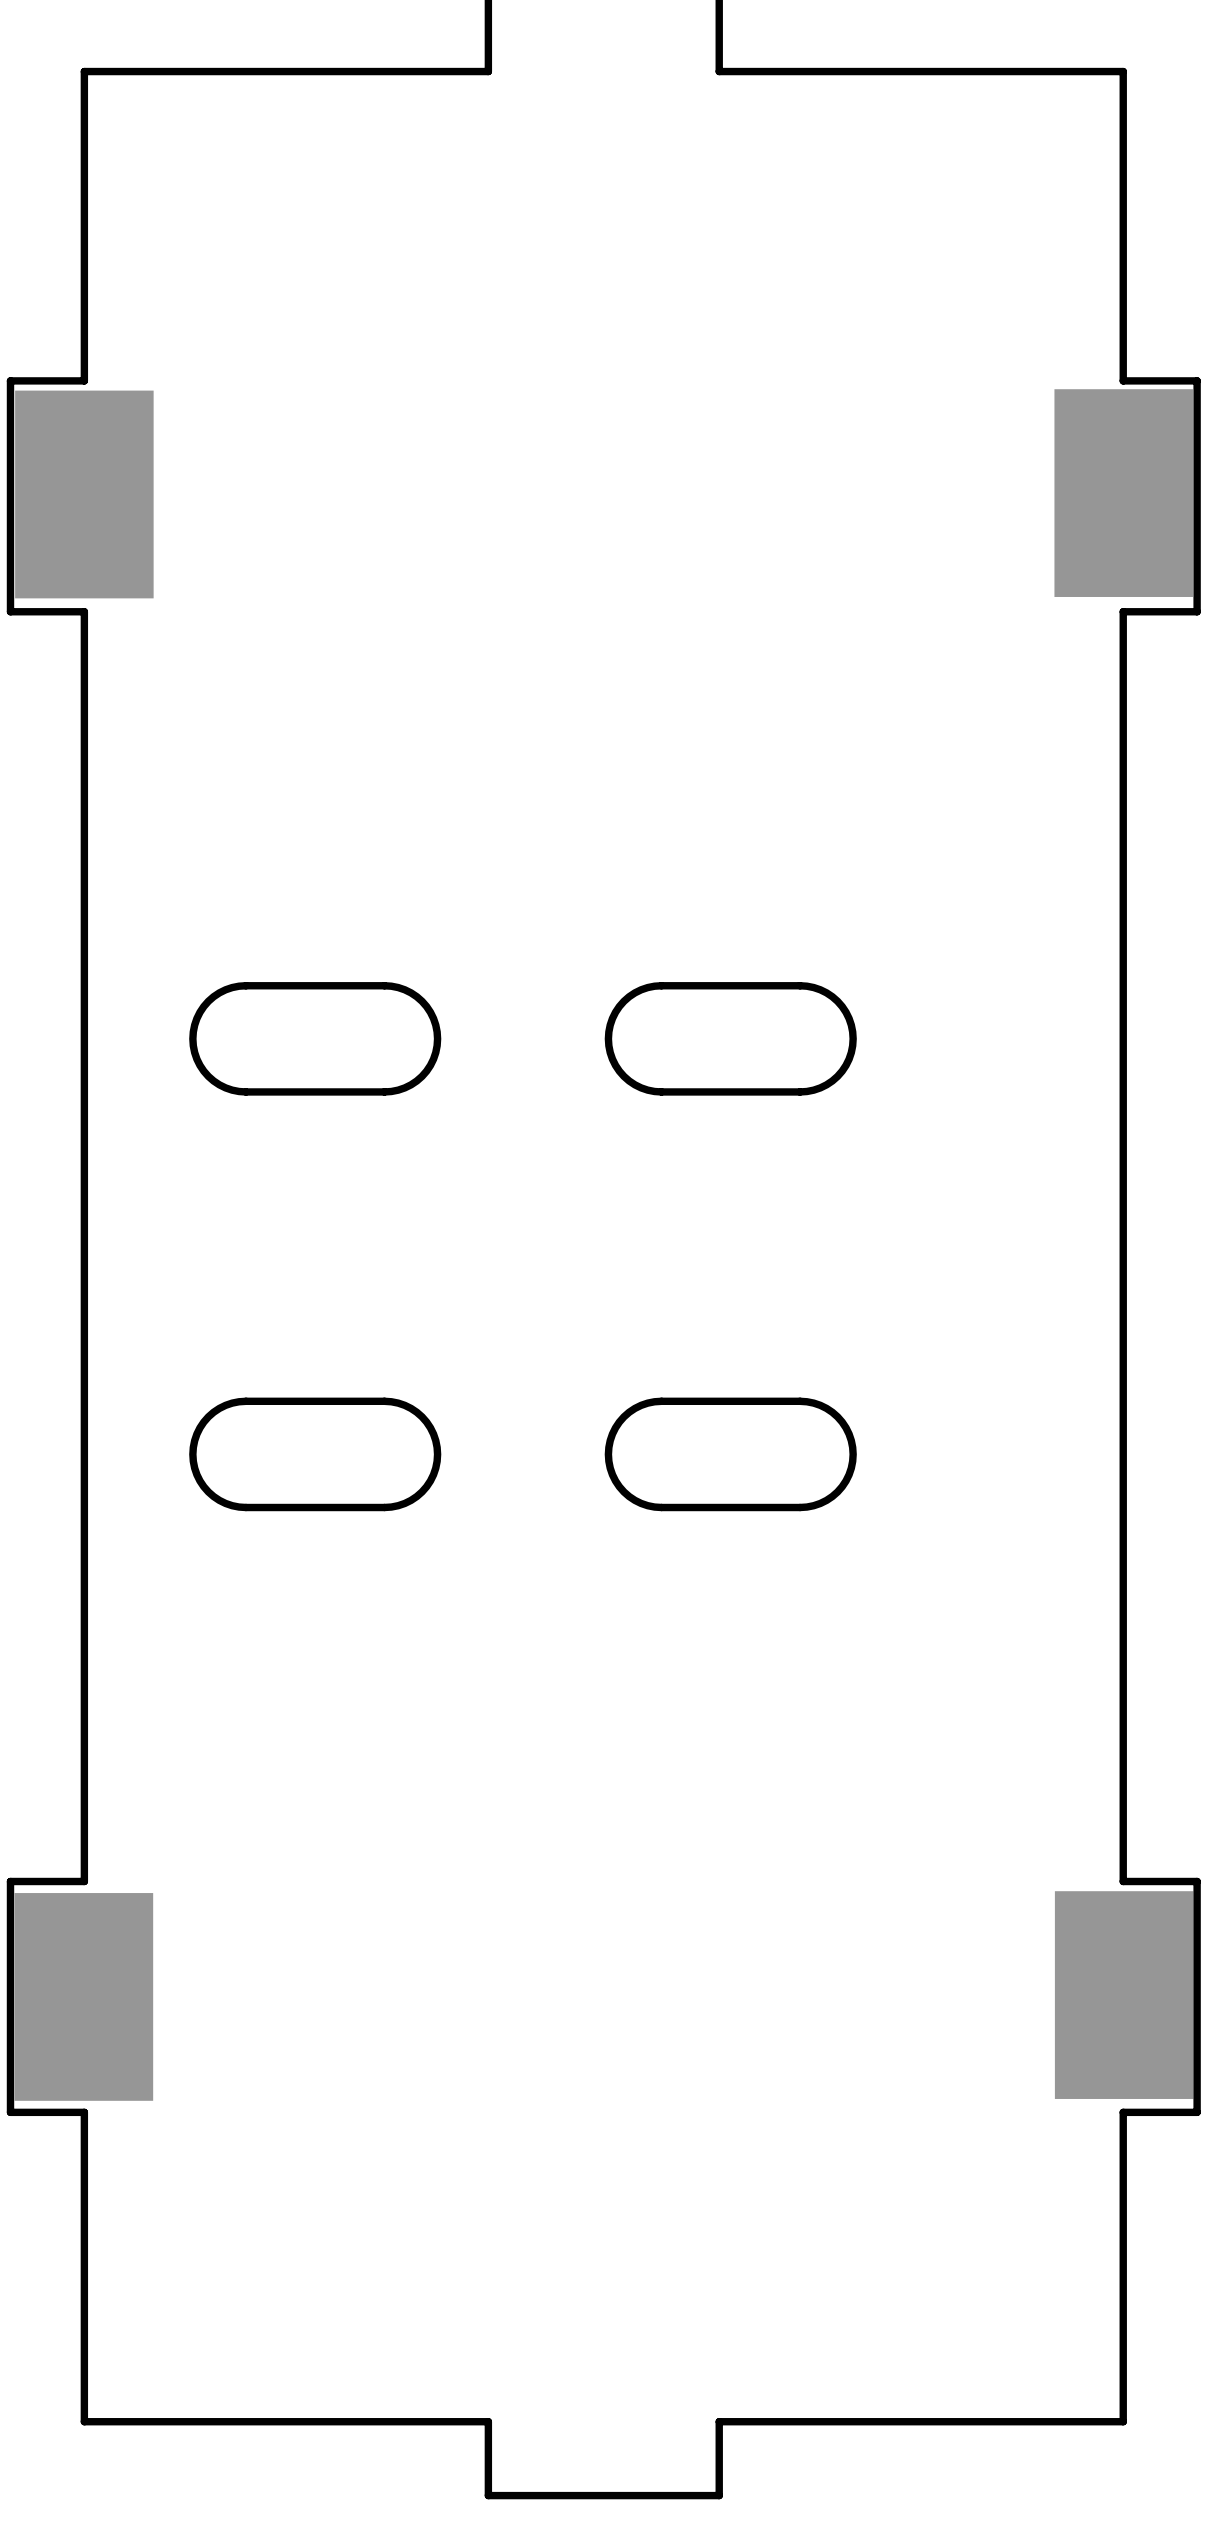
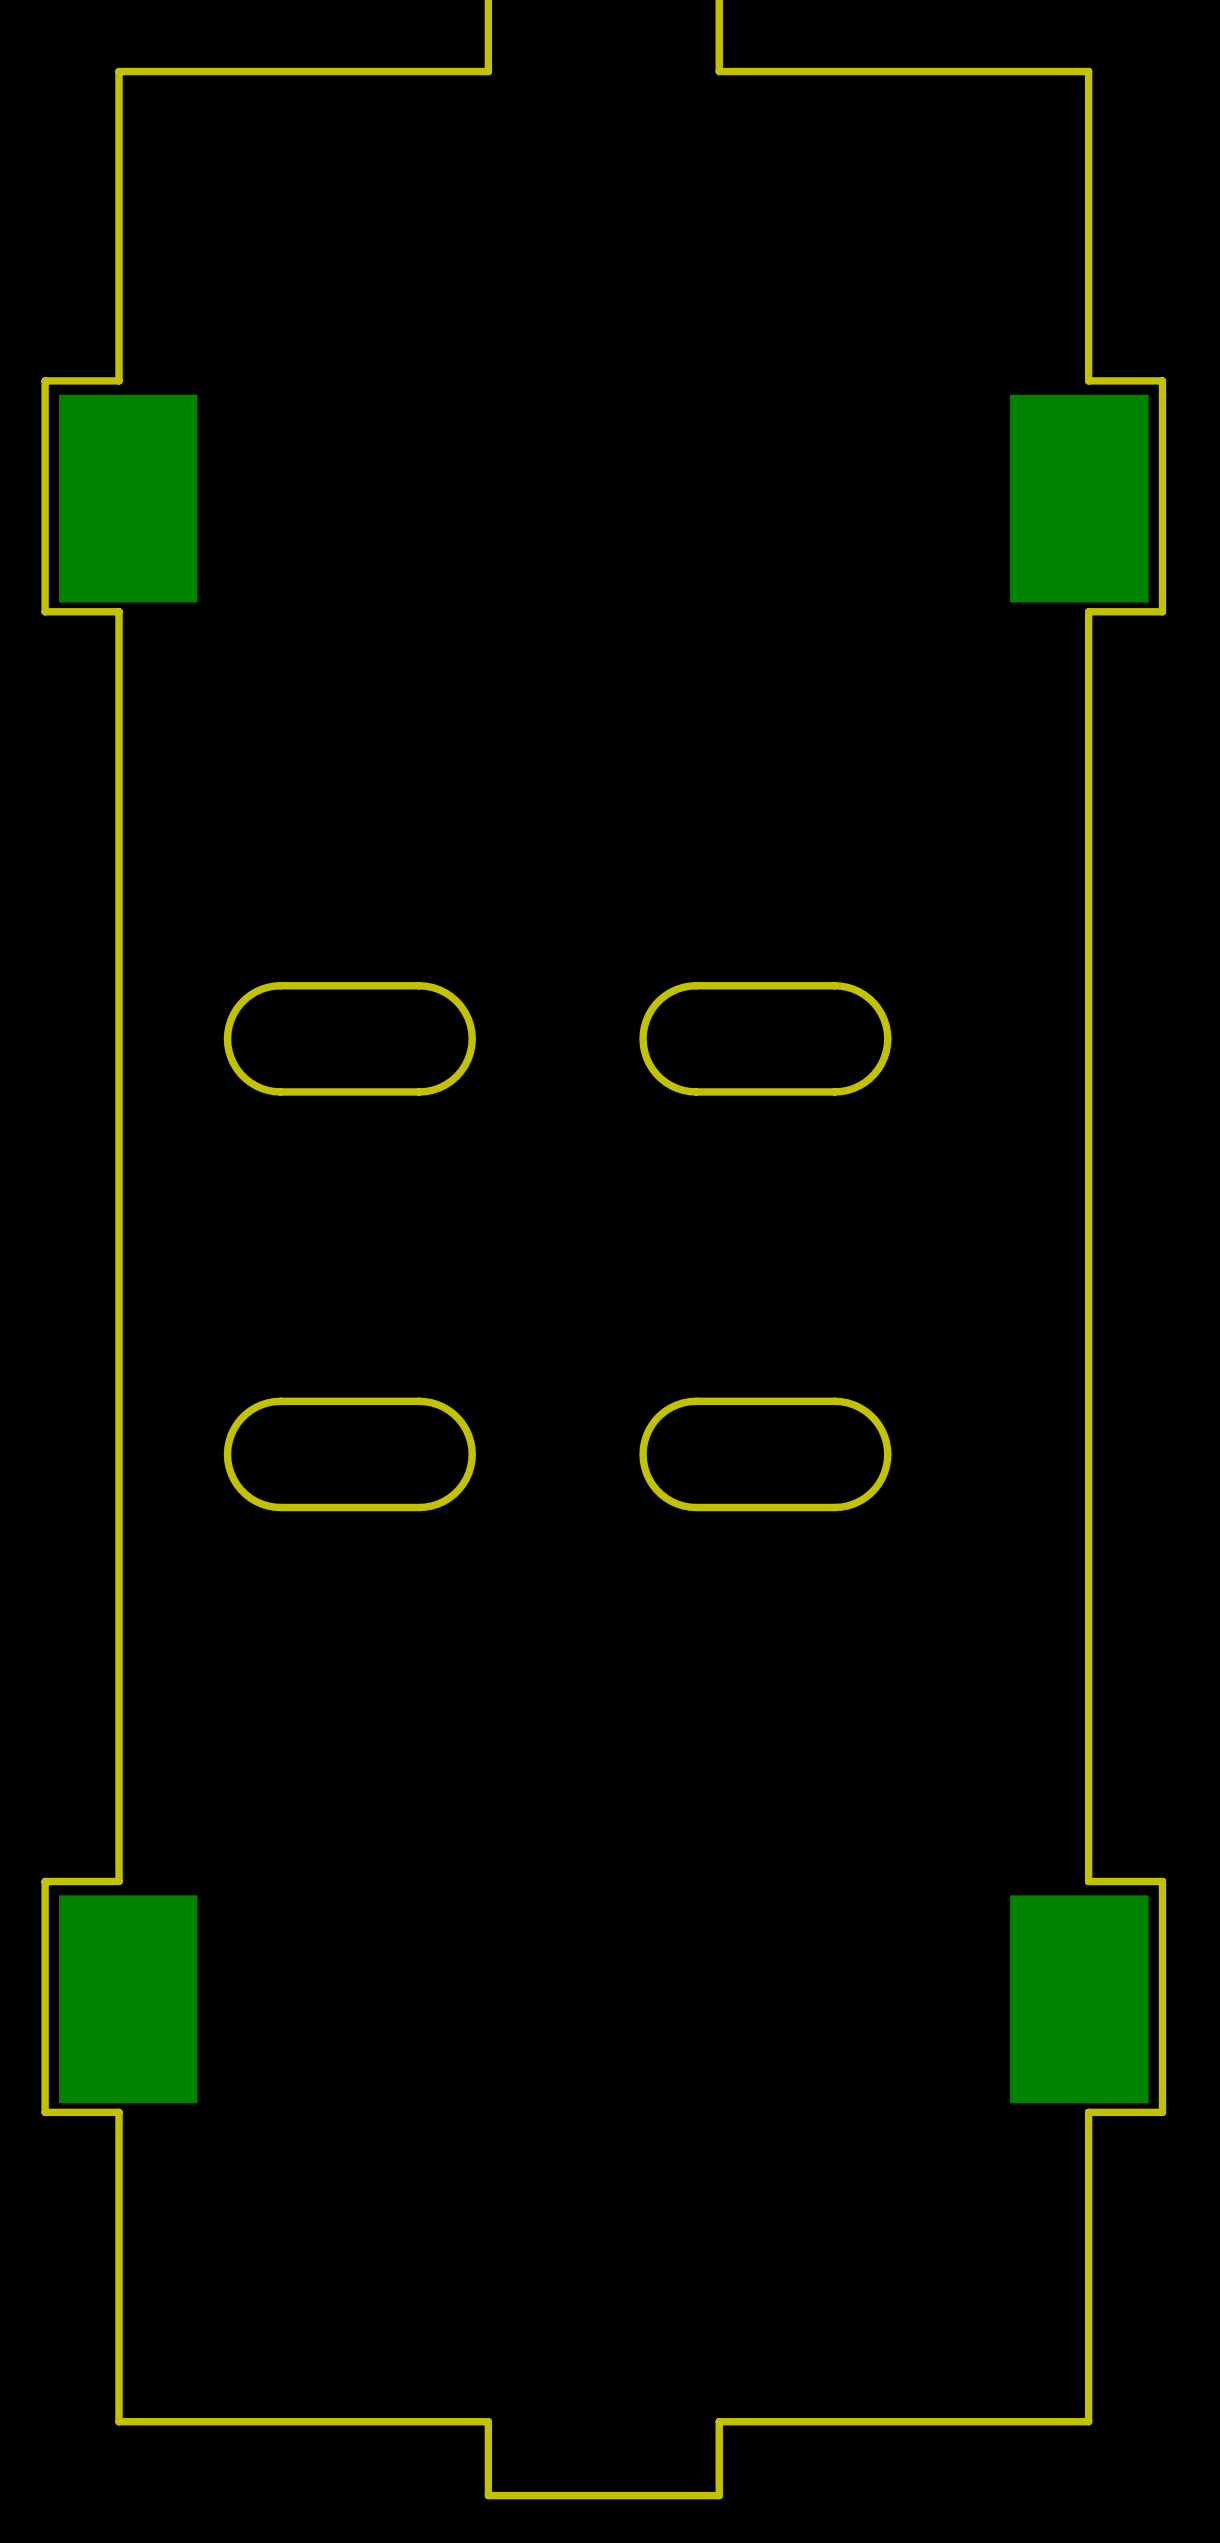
board edge: (118, 71) (84, 71) (84, 380) -> (118, 71) (118, 380) (84, 380)
board edge: (1088, 71) (1123, 71) (1123, 380) -> (1088, 71) (1088, 380) (1123, 380)
board edge: (45, 380) (10, 380) (10, 611) (45, 611) -> (45, 380) (45, 611)
board edge: (1162, 380) (1197, 380) (1197, 611) (1162, 611) -> (1162, 380) (1162, 611)
part position: (1123, 493) -> (1079, 498)
part position: (84, 494) -> (128, 498)
board edge: (84, 611) (84, 1881) -> (84, 611) (118, 611) (118, 1881) (84, 1881)
board edge: (1123, 611) (1123, 1881) -> (1123, 611) (1088, 611) (1088, 1881) (1123, 1881)
board edge: (280, 985) (239, 986) (219, 992) (208, 1001) (199, 1012) (194, 1025) (192, 1038) (194, 1052) (199, 1065) (208, 1076) (219, 1084) (239, 1091) (280, 1091) -> (280, 985) (261, 989) (245, 999) (236, 1008) (230, 1020) (227, 1038) (230, 1057) (236, 1069) (245, 1078) (261, 1088) (280, 1091)
board edge: (384, 985) (404, 989) (422, 1001) (433, 1018) (437, 1038) (433, 1059) (422, 1076) (404, 1087) (384, 1091) -> (384, 985) (426, 986) (445, 992) (456, 1001) (465, 1012) (470, 1025) (472, 1038) (470, 1052) (465, 1065) (456, 1076) (445, 1084) (426, 1091) (384, 1091)
board edge: (696, 985) (654, 986) (634, 992) (623, 1001) (615, 1012) (610, 1025) (608, 1038) (610, 1052) (615, 1065) (623, 1076) (634, 1084) (654, 1091) (696, 1091) -> (696, 985) (683, 987) (671, 991) (656, 1003) (646, 1020) (643, 1038) (644, 1051) (649, 1063) (660, 1078) (677, 1088) (696, 1091)
board edge: (800, 985) (820, 989) (837, 1001) (849, 1018) (853, 1038) (849, 1059) (837, 1076) (820, 1087) (800, 1091) -> (800, 985) (841, 986) (853, 989) (864, 995) (874, 1003) (881, 1014) (886, 1026) (887, 1038) (886, 1051) (881, 1063) (874, 1074) (864, 1082) (853, 1088) (841, 1091) (800, 1091)
board edge: (280, 1401) (239, 1401) (219, 1408) (208, 1416) (199, 1427) (194, 1440) (192, 1454) (194, 1468) (199, 1480) (208, 1491) (219, 1500) (239, 1507) (280, 1507) -> (280, 1401) (261, 1404) (250, 1410) (240, 1419) (230, 1435) (227, 1454) (230, 1473) (236, 1484) (245, 1494) (261, 1504) (280, 1507)
board edge: (384, 1401) (404, 1405) (422, 1416) (433, 1434) (437, 1454) (433, 1474) (422, 1491) (404, 1503) (384, 1507) -> (384, 1401) (425, 1401) (437, 1404) (449, 1410) (458, 1419) (466, 1429) (470, 1441) (472, 1454) (470, 1467) (466, 1479) (458, 1489) (449, 1498) (437, 1504) (425, 1507) (384, 1507)
board edge: (696, 1401) (654, 1401) (634, 1408) (623, 1416) (615, 1427) (610, 1440) (608, 1454) (610, 1468) (615, 1480) (623, 1491) (634, 1500) (654, 1507) (696, 1507) -> (696, 1401) (677, 1404) (665, 1410) (656, 1419) (646, 1435) (643, 1454) (646, 1473) (652, 1484) (660, 1494) (677, 1504) (696, 1507)
board edge: (800, 1401) (820, 1405) (837, 1416) (849, 1434) (853, 1454) (849, 1474) (837, 1491) (820, 1503) (800, 1507) -> (800, 1401) (841, 1401) (853, 1404) (864, 1410) (874, 1419) (881, 1429) (886, 1441) (887, 1454) (886, 1467) (881, 1479) (874, 1489) (864, 1498) (853, 1504) (841, 1507) (800, 1507)
board edge: (45, 1881) (10, 1881) (10, 2112) (45, 2112) -> (45, 1881) (45, 2112)
board edge: (1162, 1881) (1197, 1881) (1197, 2112) (1162, 2112) -> (1162, 1881) (1162, 2112)
part position: (1124, 1995) -> (1079, 1999)
part position: (83, 1996) -> (128, 1999)
board edge: (84, 2112) (84, 2421) (118, 2421) -> (84, 2112) (118, 2112) (118, 2421)
board edge: (1123, 2112) (1123, 2421) (1088, 2421) -> (1123, 2112) (1088, 2112) (1088, 2421)

